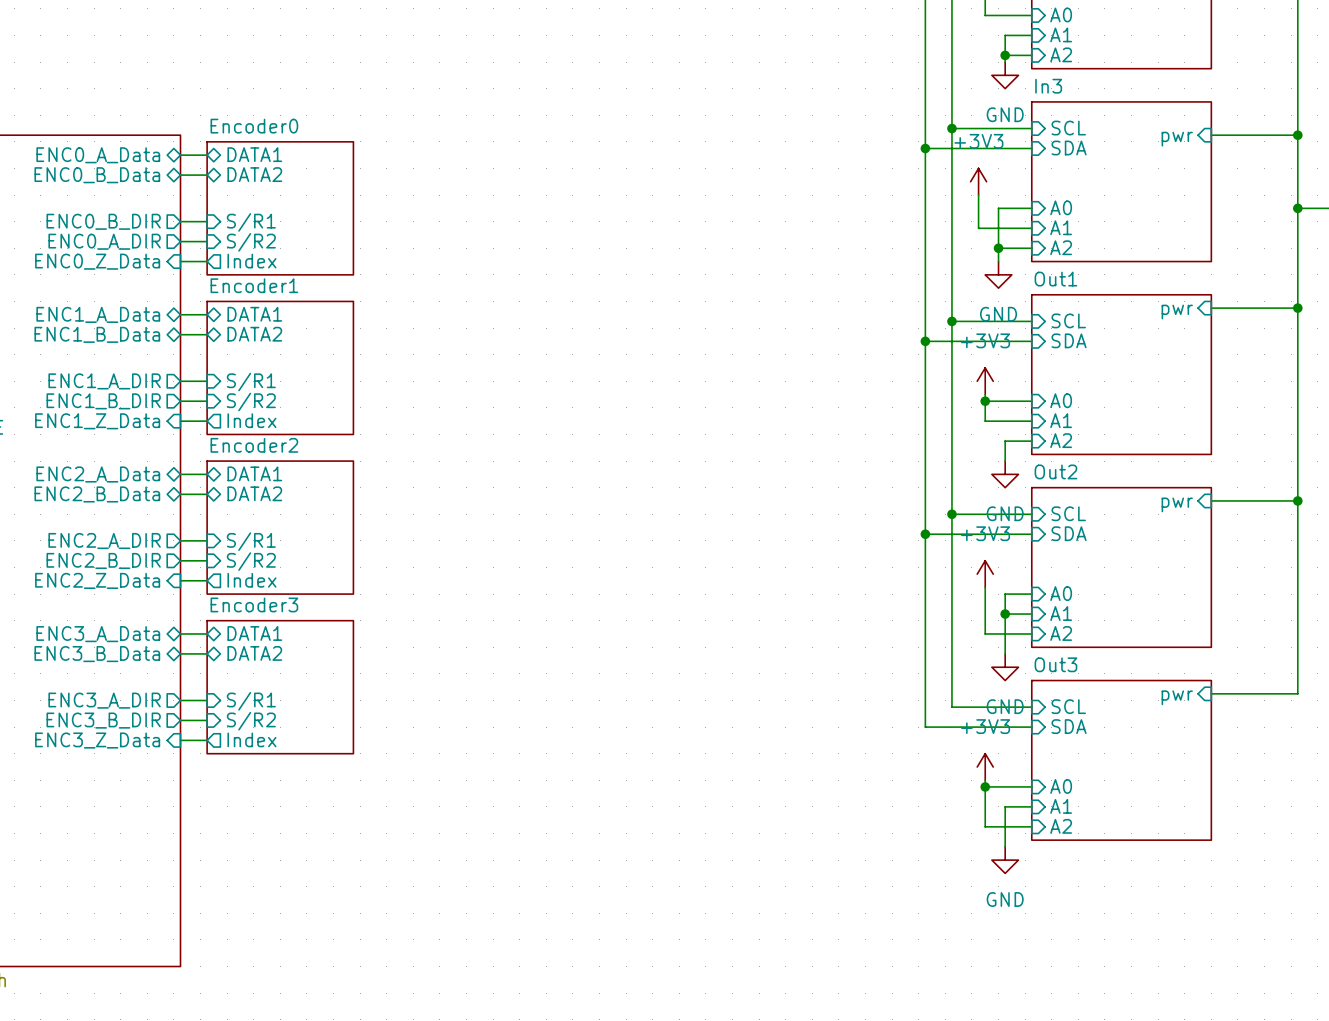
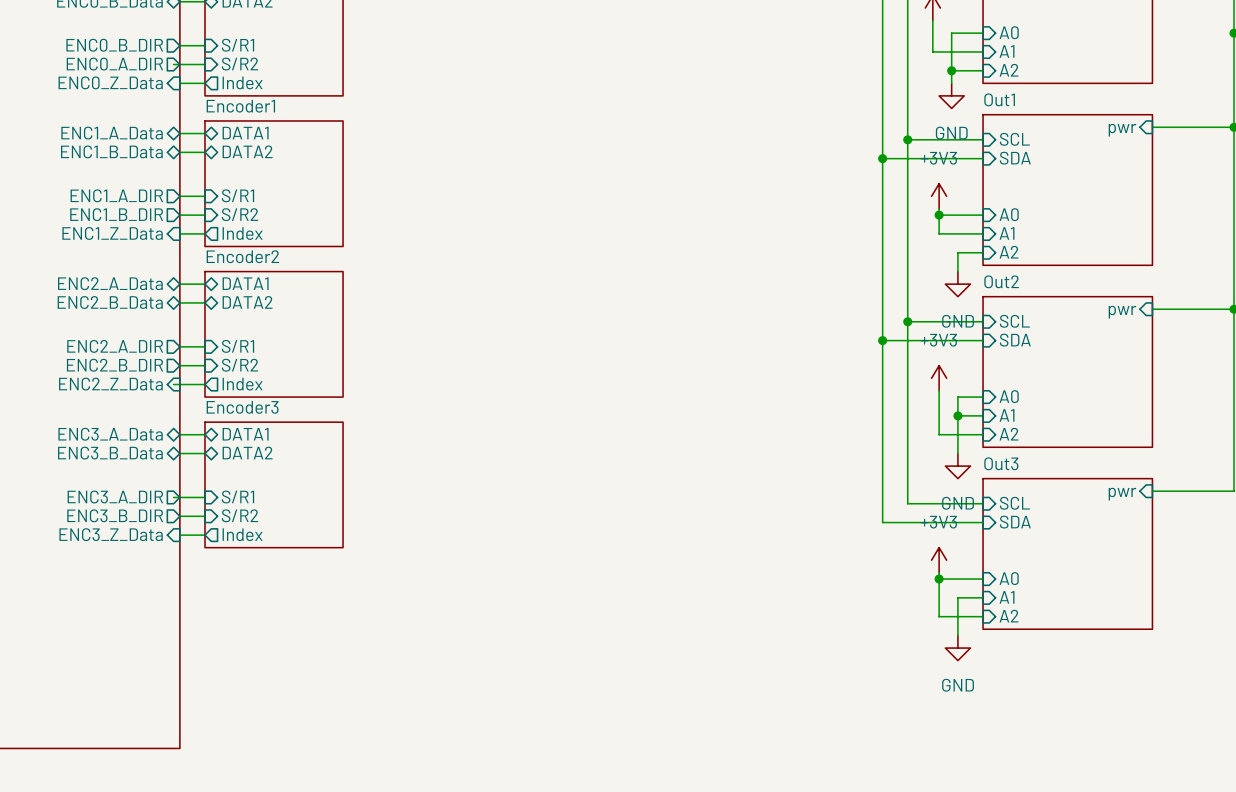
wire: none -> (173, 64) (179, 64)
wire: none -> (173, 384) (179, 384)
wire: none -> (173, 497) (179, 497)

